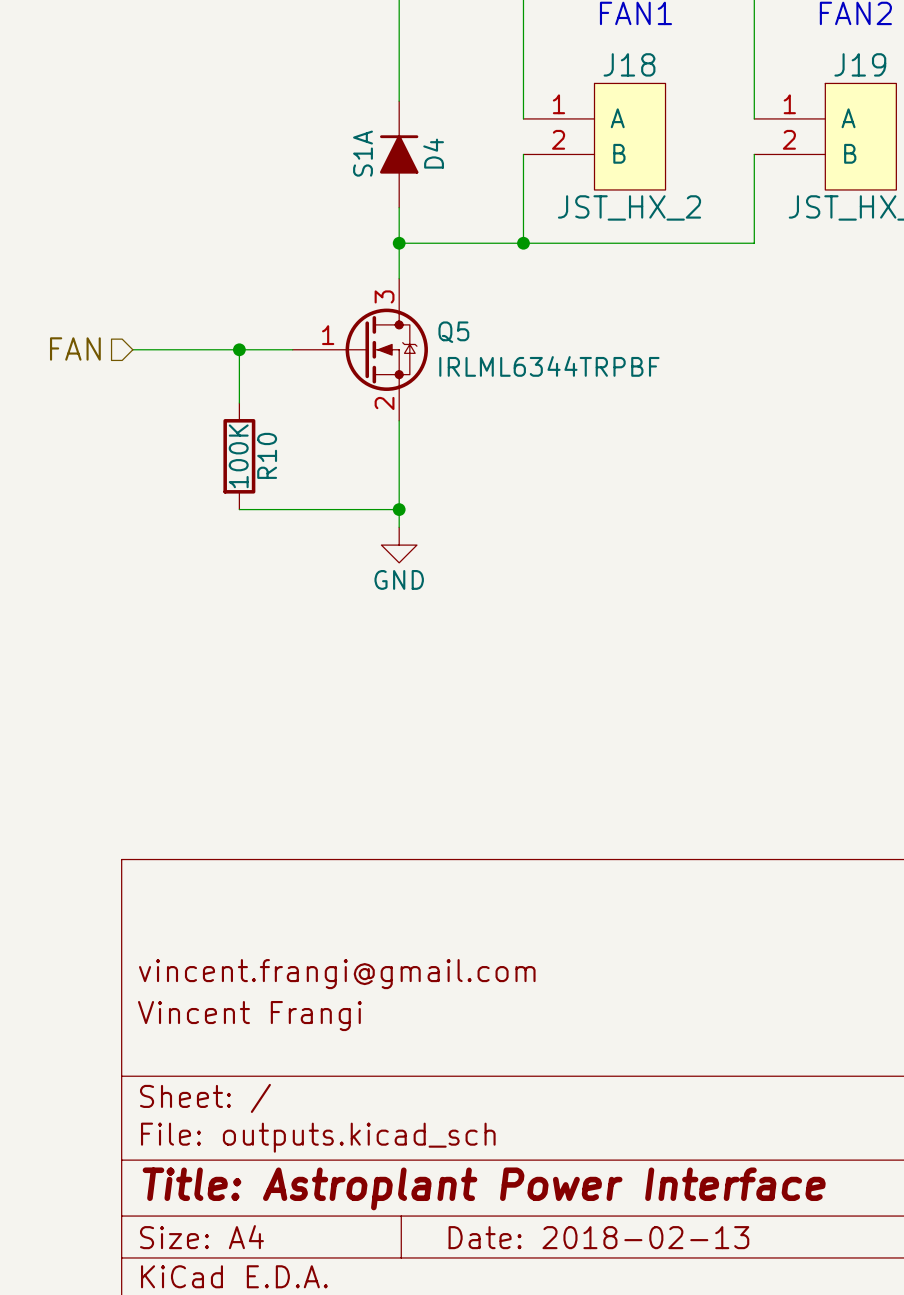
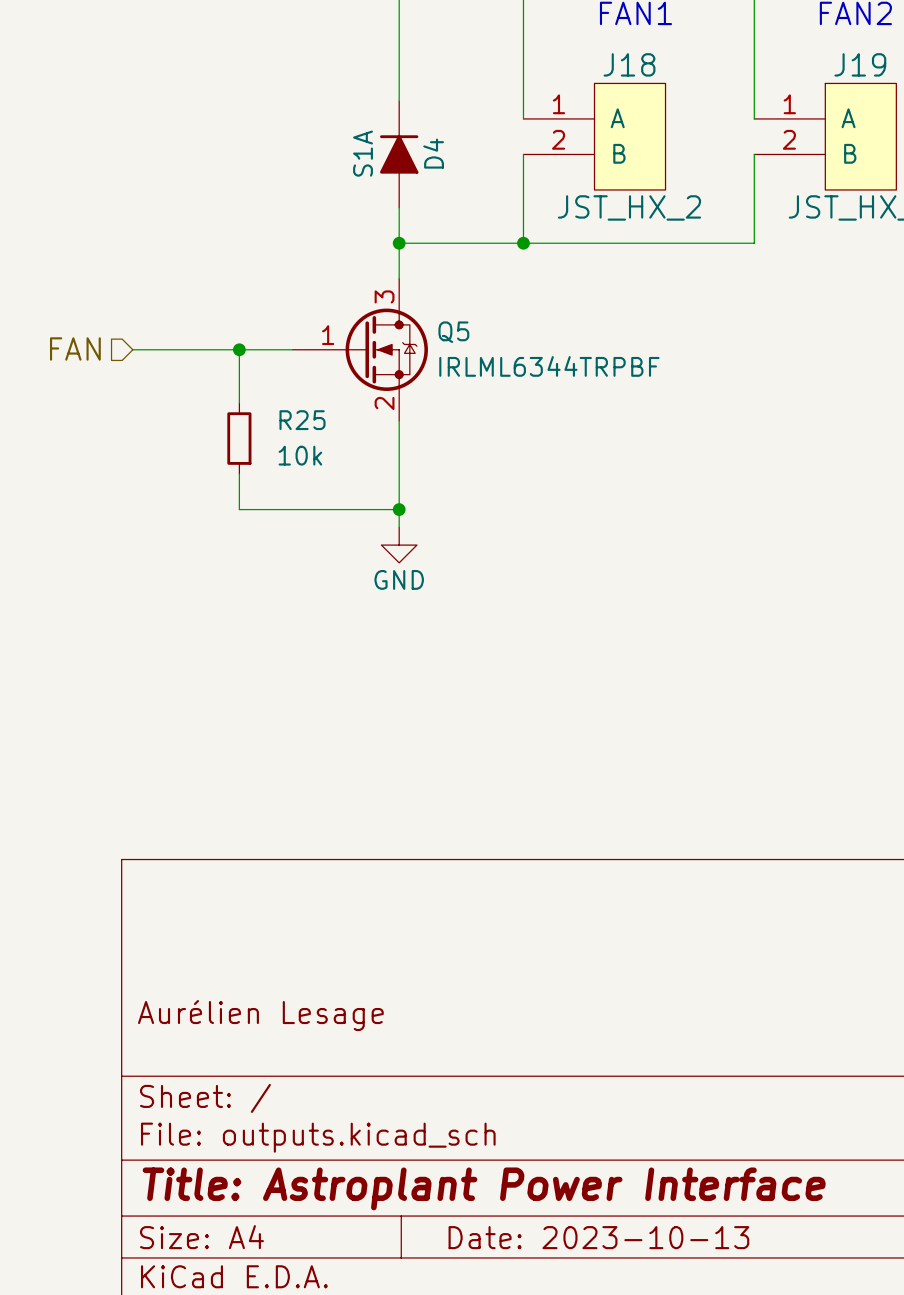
R25: none -> 10k (239, 438)
R10: 100K (239, 456) -> none
title block: vincent.frangi@gmail.com (337, 974) -> none
title block: Vincent Frangi (249, 1016) -> Aurélien Lesage (260, 1015)
title block: Date: 2018-02-13 (598, 1237) -> Date: 2023-10-13 (598, 1237)

